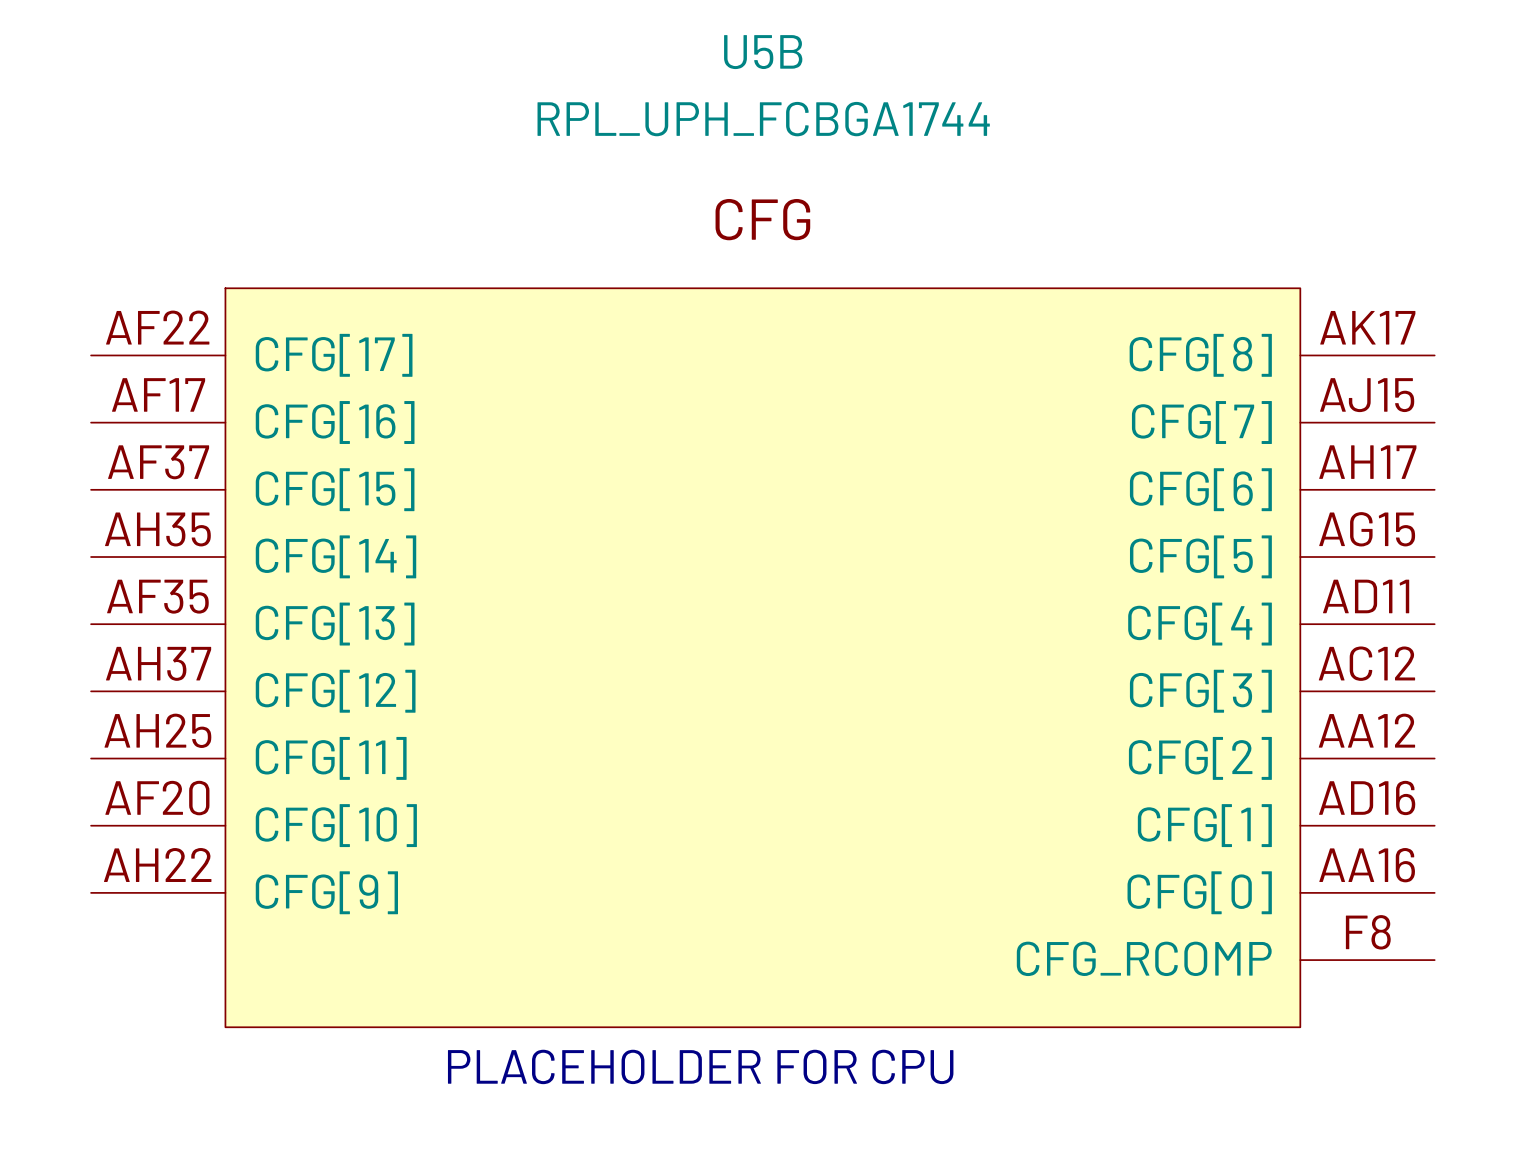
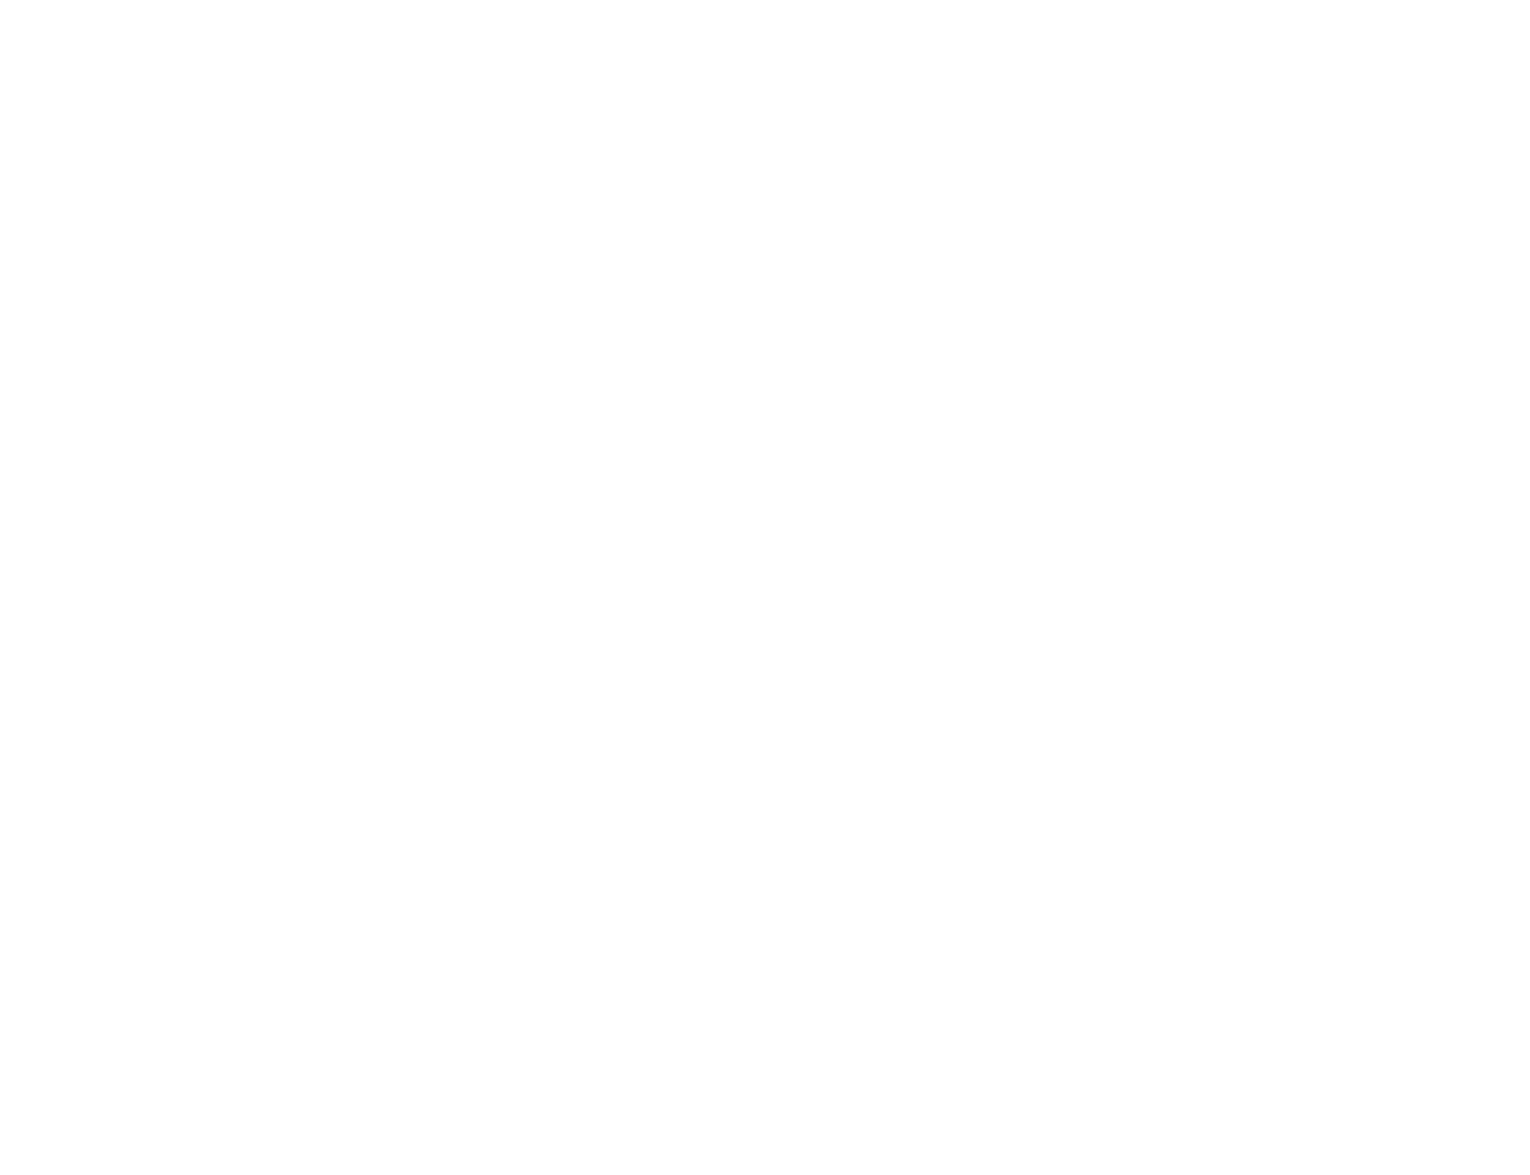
U5B: RPL_UPH_FCBGA1744 (762, 657) -> none
text: PLACEHOLDER FOR CPU (700, 1066) -> none

